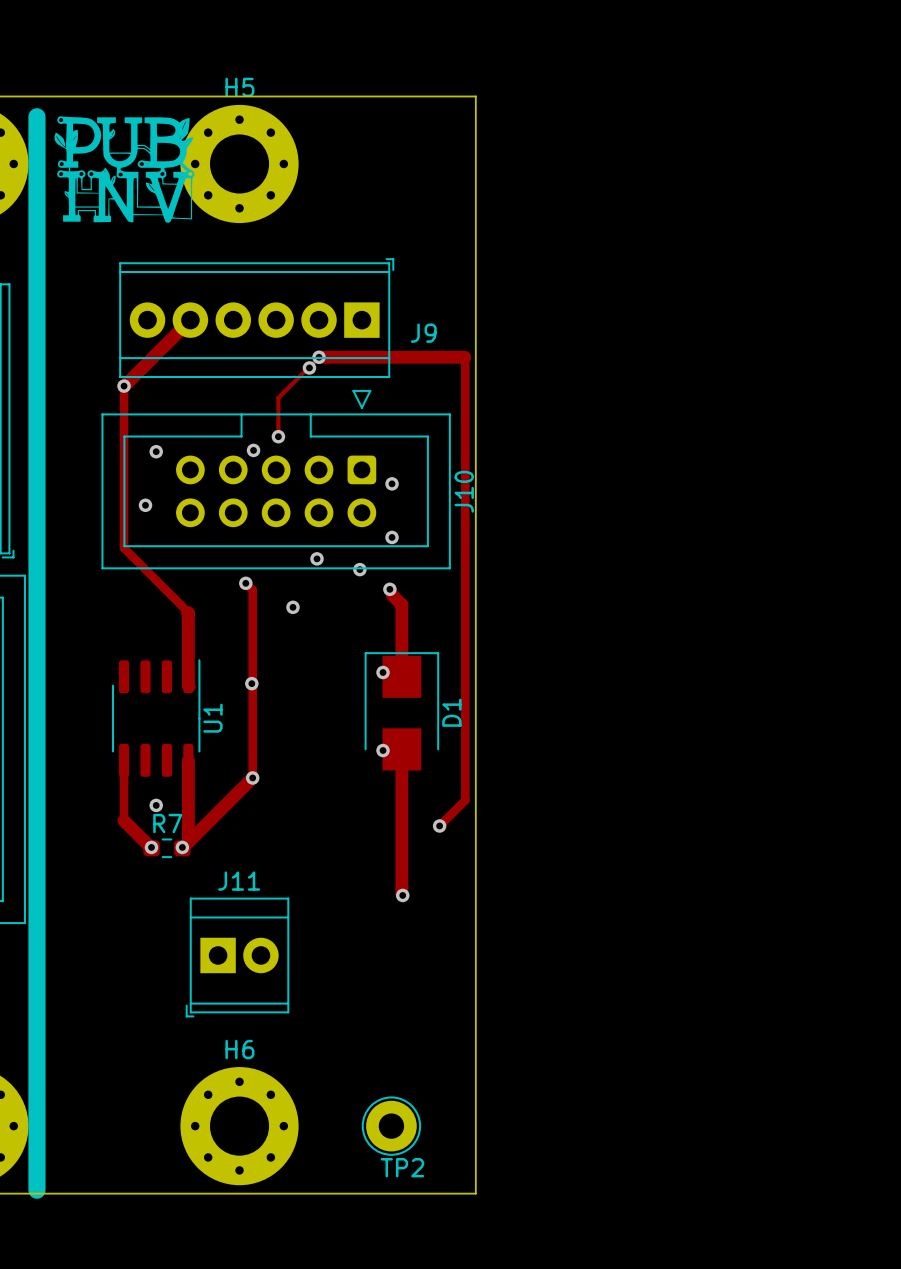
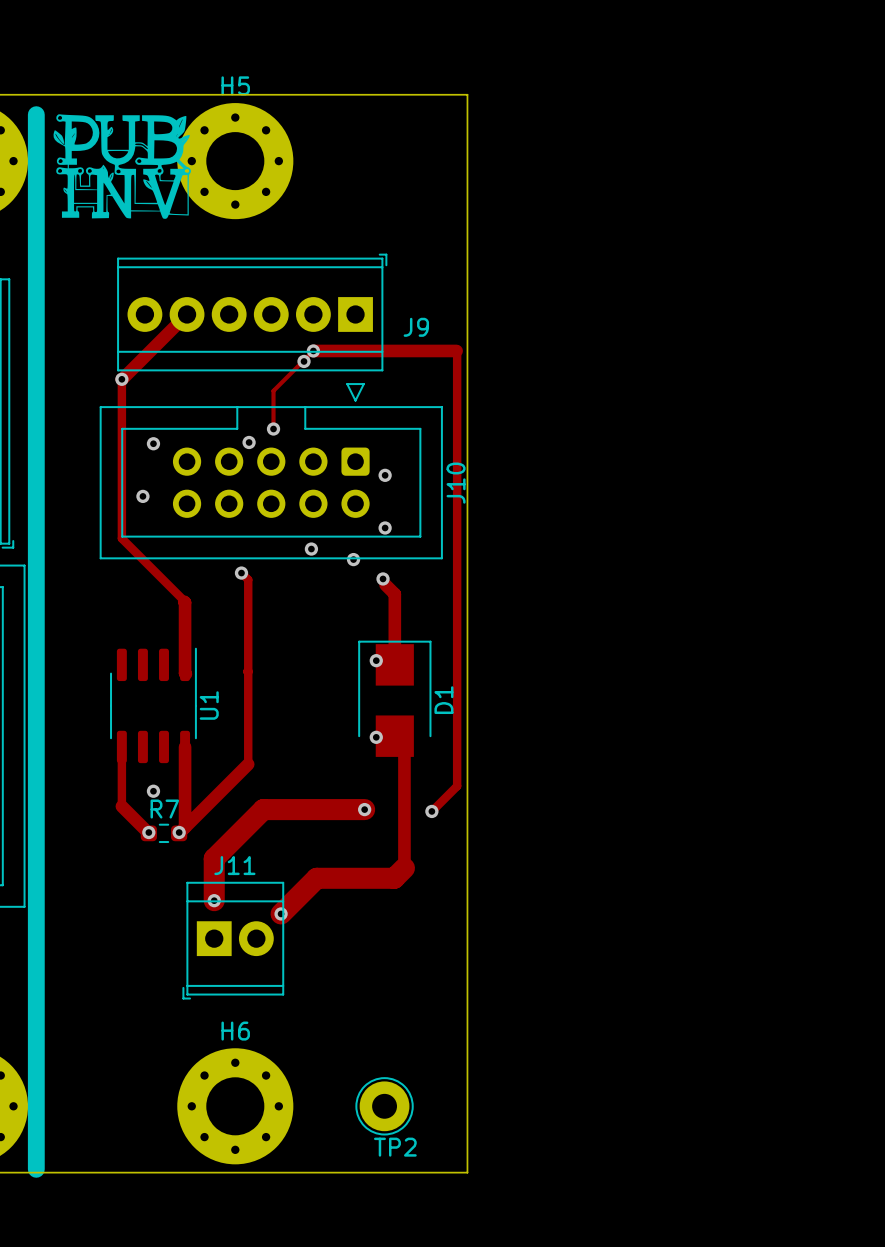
via: (292, 607) -> none
via: (251, 683) -> none
track: (401, 749) (402, 895) -> (394, 736) (404, 745) (404, 868) (394, 878) (316, 878) (281, 913)
via: (252, 777) -> none
track: none -> (364, 809) (263, 809) (214, 858) (214, 900)
via: none -> (364, 809)
via: (402, 895) -> none
via: none -> (214, 900)
via: none -> (281, 913)

